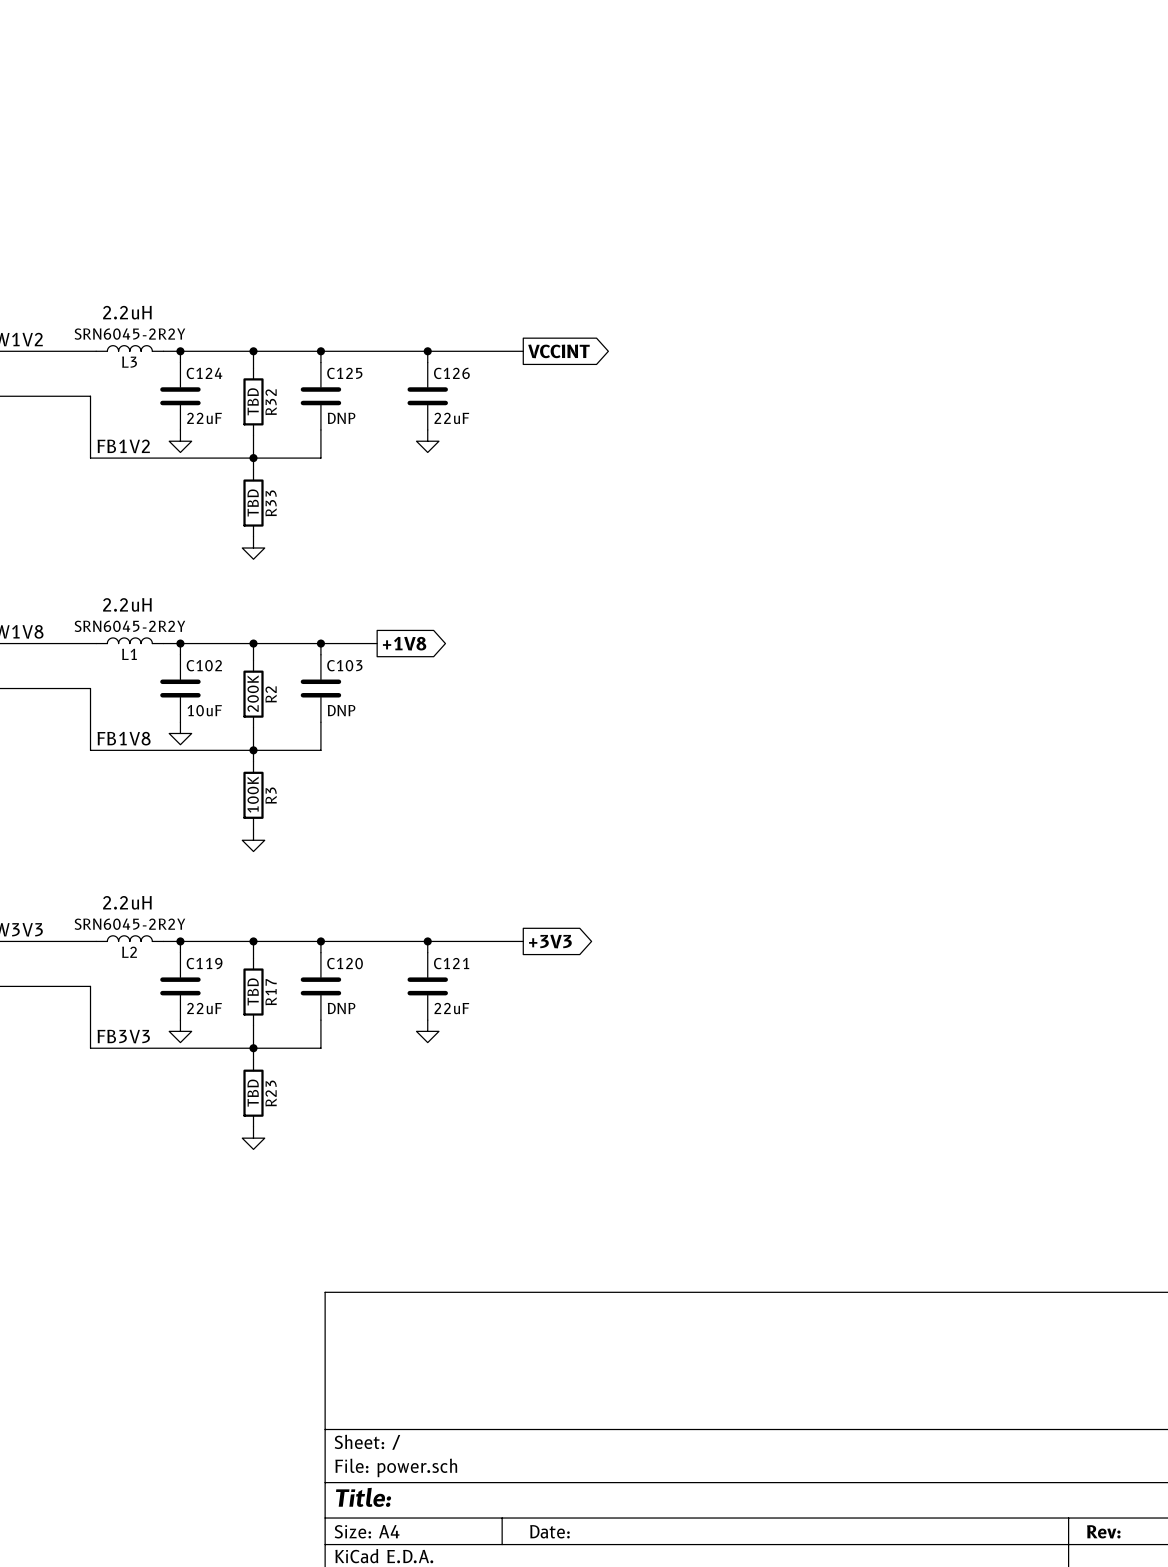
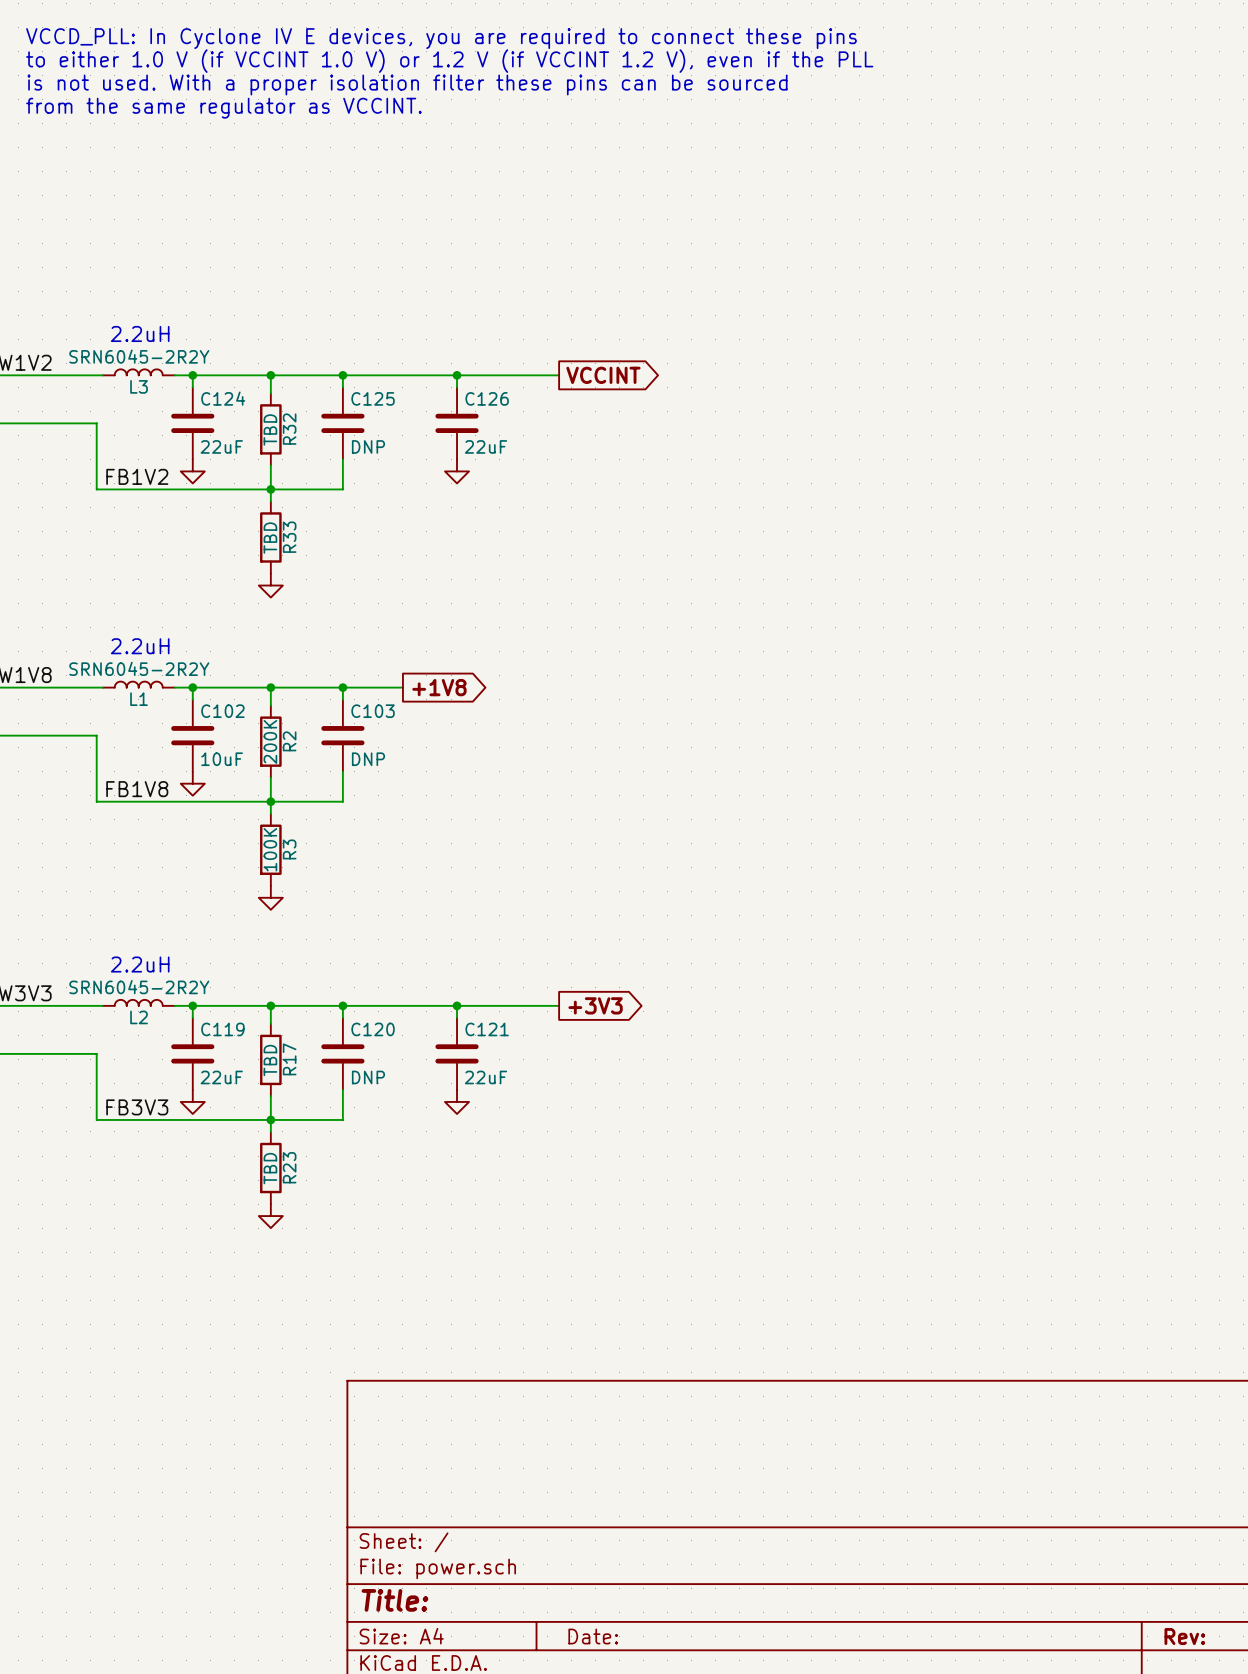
text: none -> VCCD_PLL: In Cyclone IV E devices, you are required to connect these pins (441, 38)
text: none -> to either 1.0 V (if VCCINT 1.0 V) or 1.2 V (if VCCINT 1.2 V), even if the PLL (449, 61)
text: none -> is not used. With a proper isolation filter these pins can be sourced (407, 84)
text: none -> from the same regulator as VCCINT. (223, 108)

